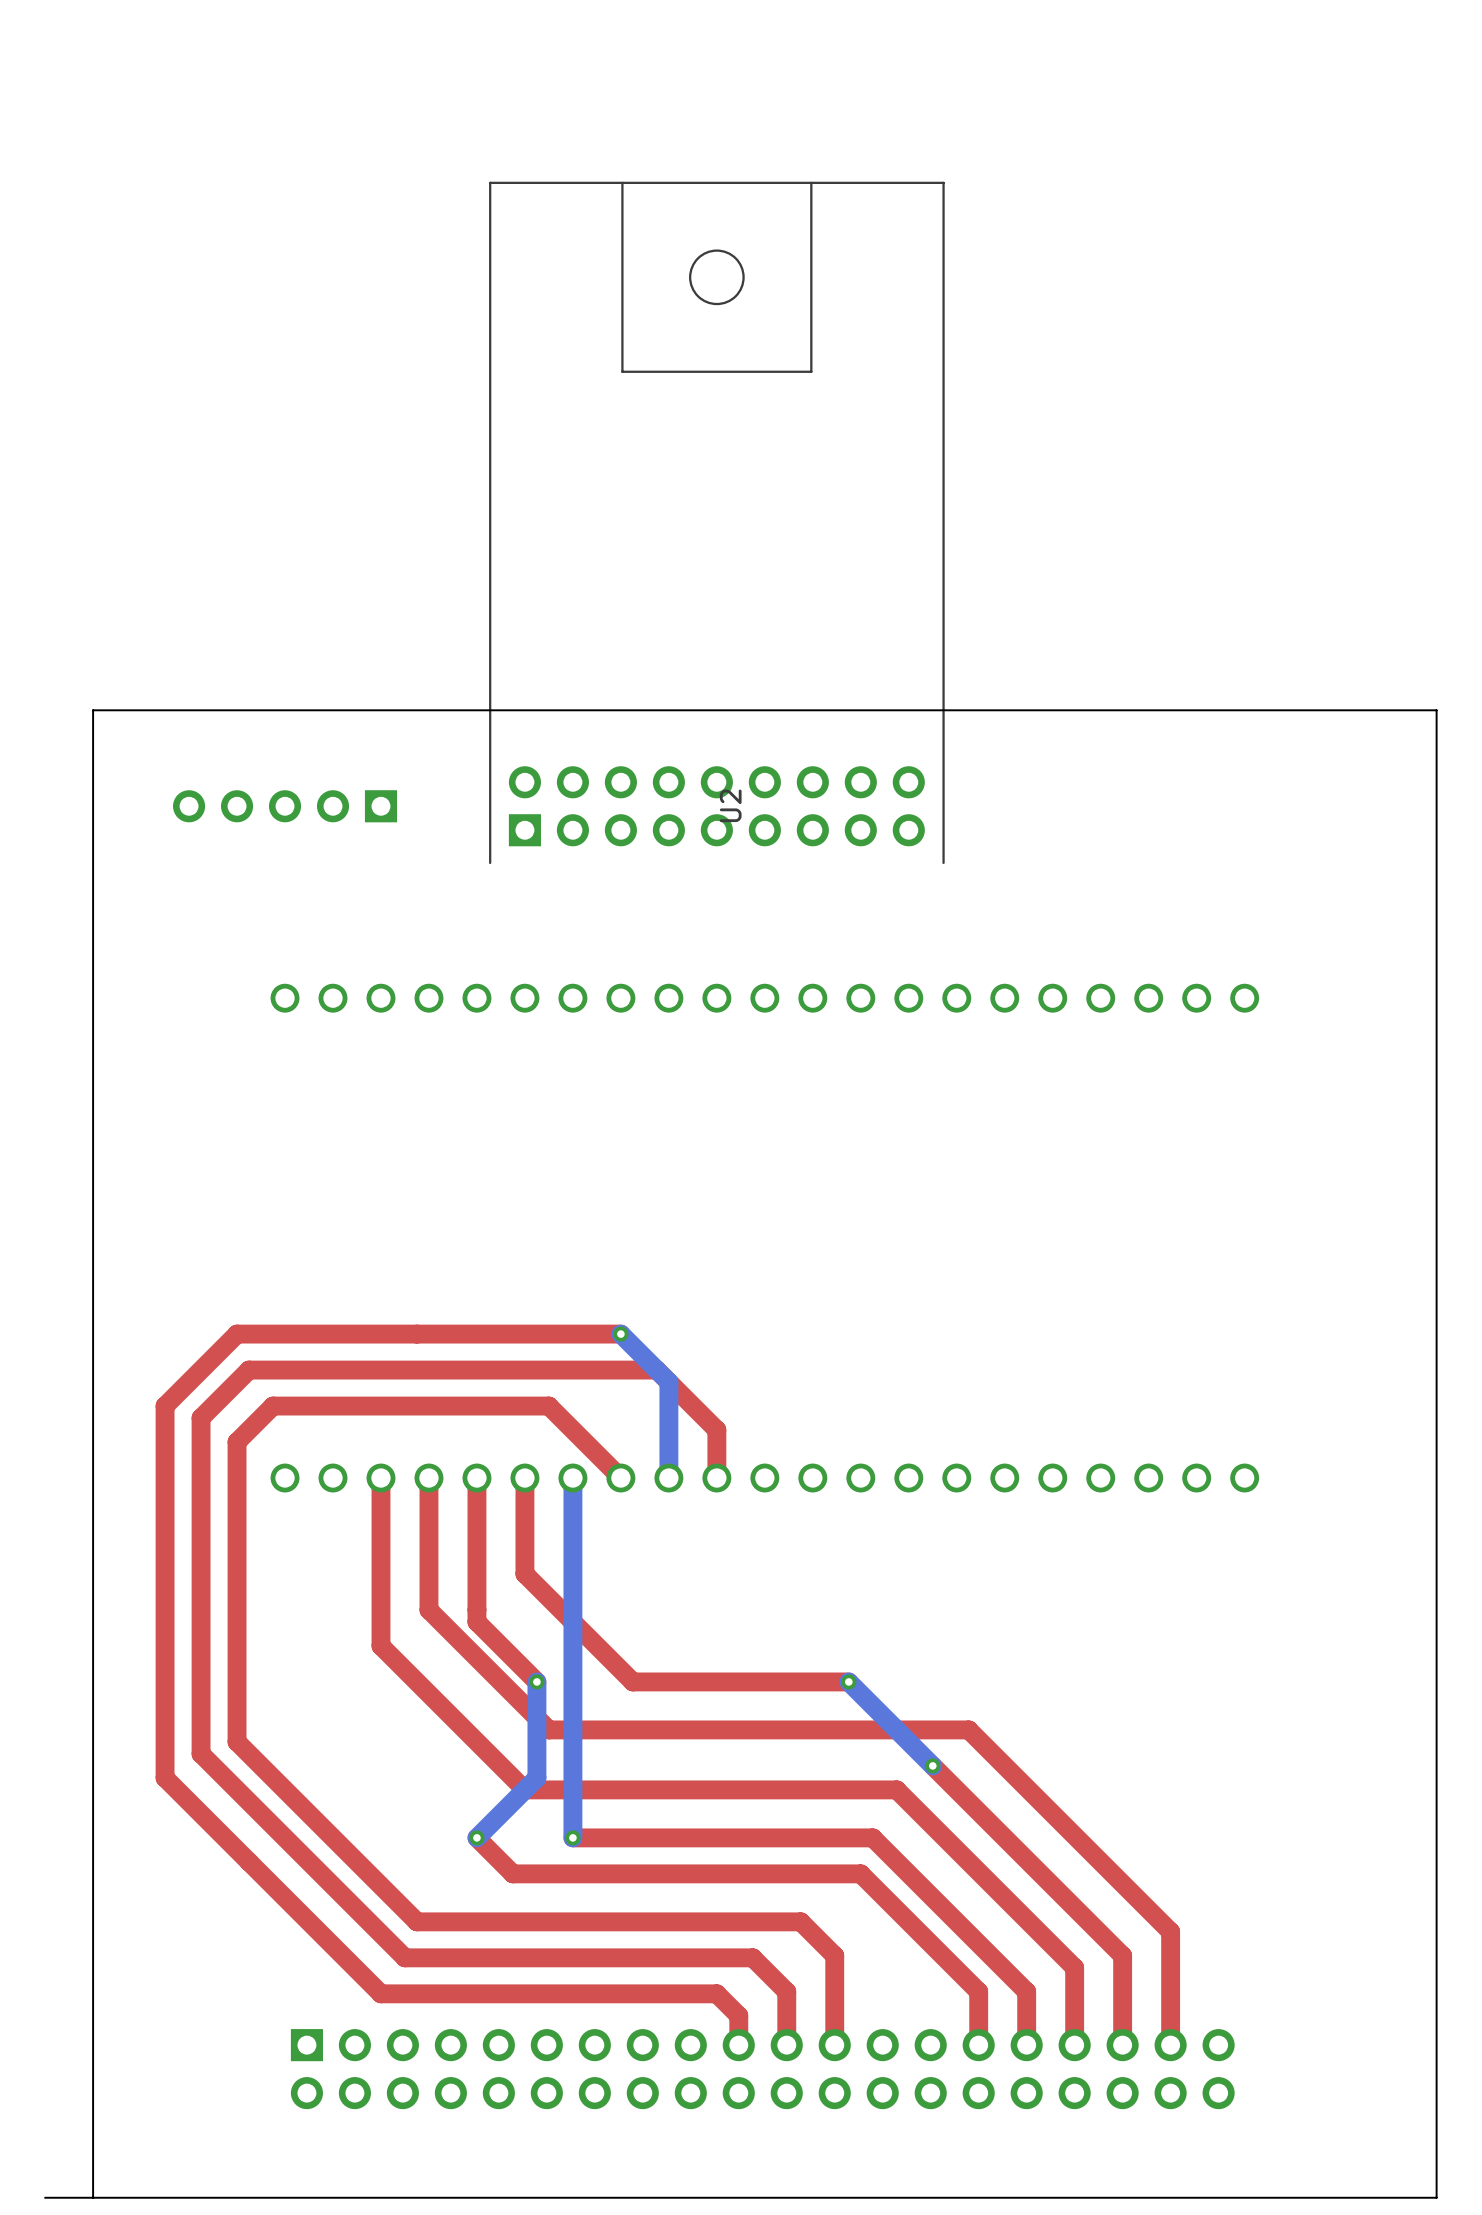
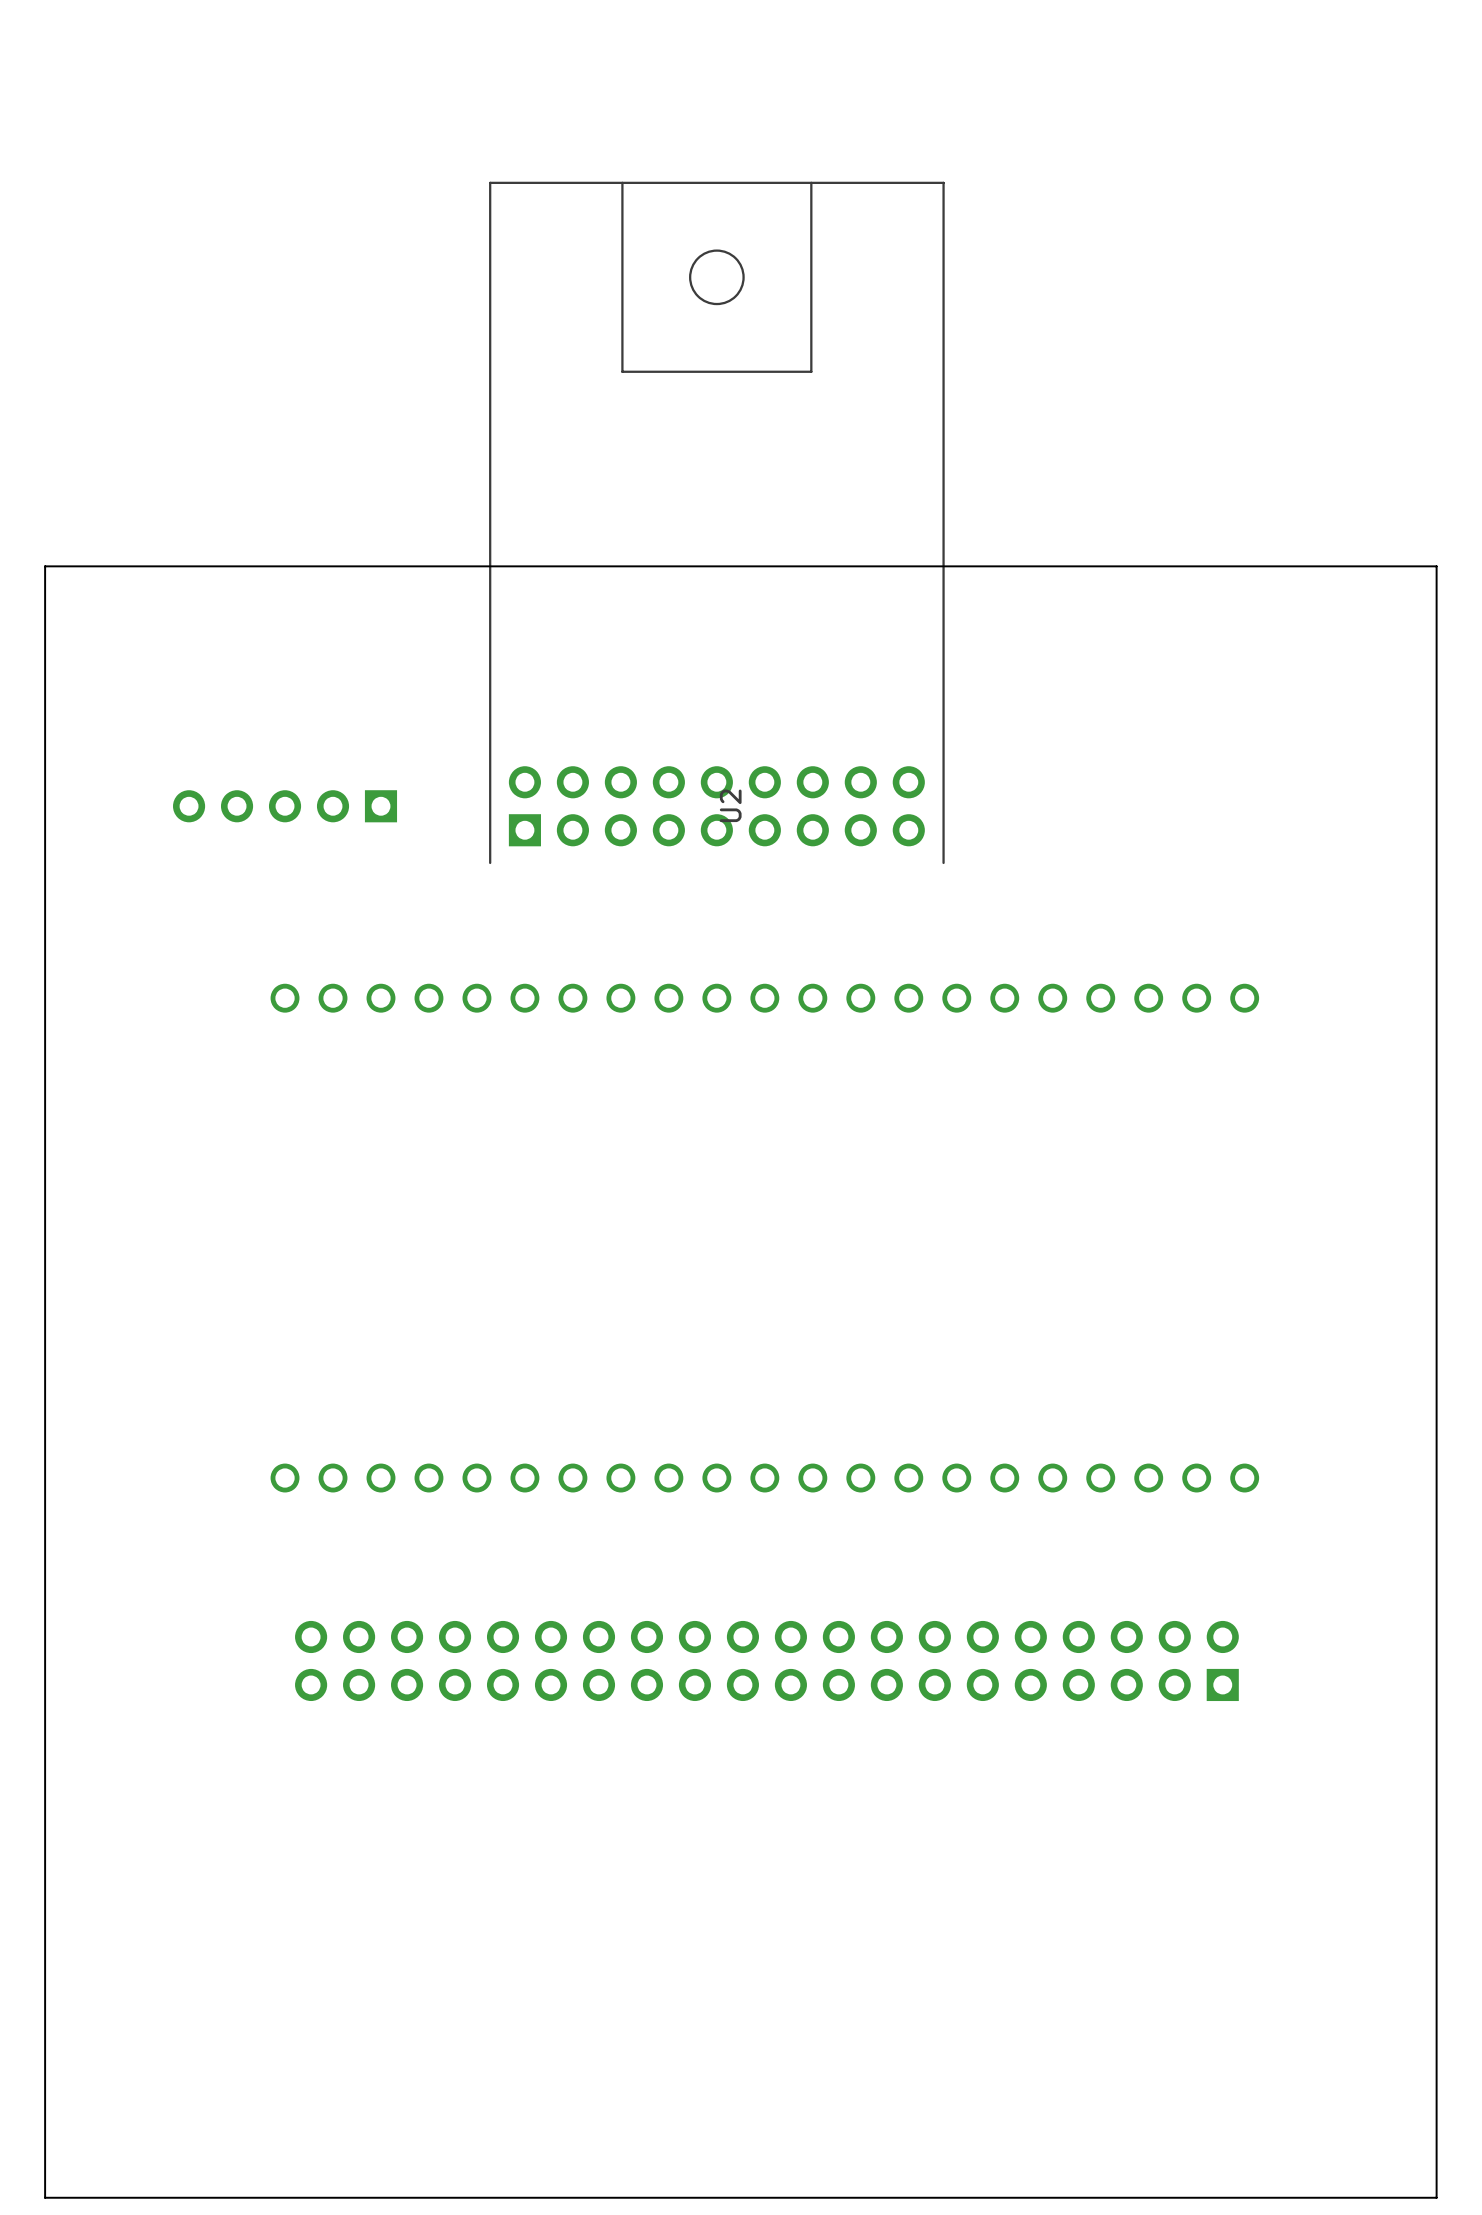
board edge: (1436, 710) (93, 710) (93, 2197) -> (1436, 710) (1436, 566) (45, 566) (45, 2197)
top track: (620, 1334) (237, 1334) (165, 1406) (165, 1777) (380, 1993) (716, 1993) (738, 2015) (738, 2045) -> none
bottom track: (620, 1334) (668, 1382) (668, 1478) -> none
via: (620, 1334) -> none
top track: (380, 1478) (380, 1645) (524, 1789) (896, 1789) (1074, 1967) (1074, 2045) -> none
top track: (428, 1478) (428, 1609) (548, 1729) (968, 1729) (1170, 1931) (1170, 2045) -> none
top track: (476, 1478) (476, 1621) (536, 1681) -> none
top track: (524, 1478) (524, 1573) (632, 1681) (848, 1681) -> none
bottom track: (572, 1478) (572, 1837) -> none
top track: (620, 1478) (548, 1406) (273, 1406) (237, 1442) (237, 1741) (416, 1921) (800, 1921) (834, 1955) (834, 2045) -> none
top track: (716, 1478) (716, 1430) (656, 1370) (249, 1370) (201, 1418) (201, 1753) (404, 1957) (752, 1957) (786, 1991) (786, 2045) -> none
bottom track: (536, 1681) (536, 1777) (476, 1837) -> none
via: (536, 1681) -> none
bottom track: (848, 1681) (932, 1765) -> none
via: (848, 1681) -> none
top track: (932, 1765) (1122, 1955) (1122, 2045) -> none
via: (932, 1765) -> none
top track: (476, 1837) (512, 1873) (860, 1873) (978, 1991) (978, 2045) -> none
via: (476, 1837) -> none
top track: (572, 1837) (872, 1837) (1026, 1991) (1026, 2045) -> none
via: (572, 1837) -> none
part rotation: 0° (762, 2069) -> 180° (766, 1660)

